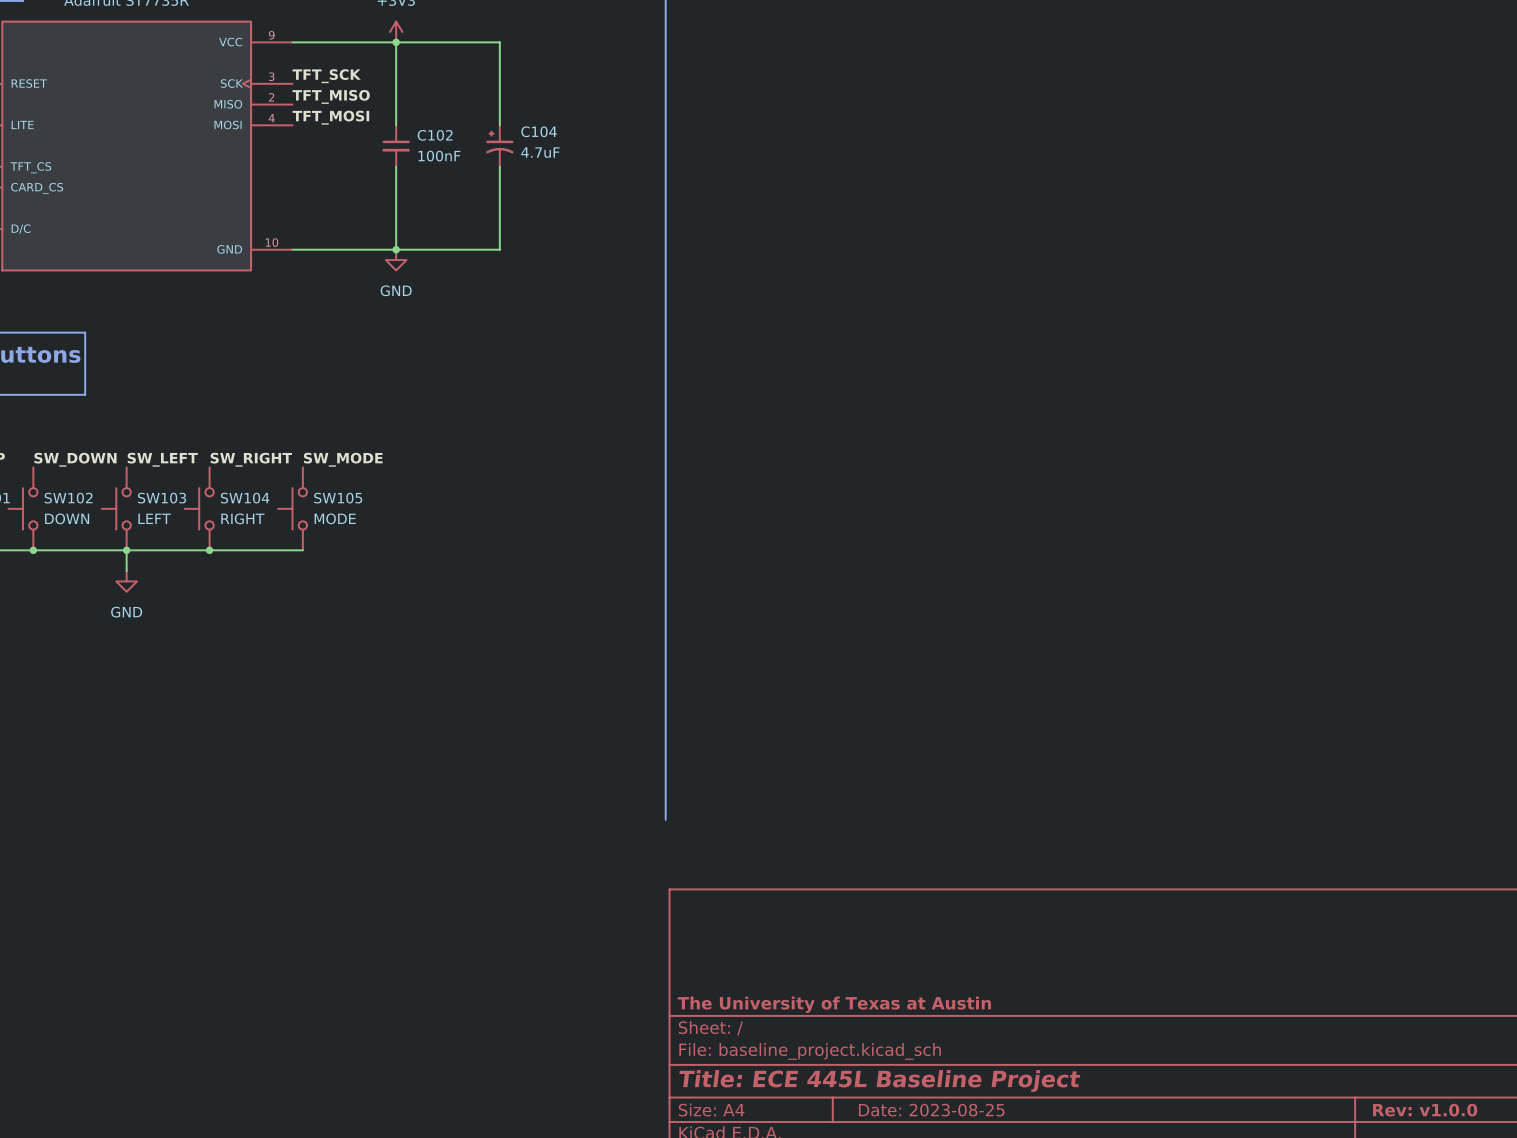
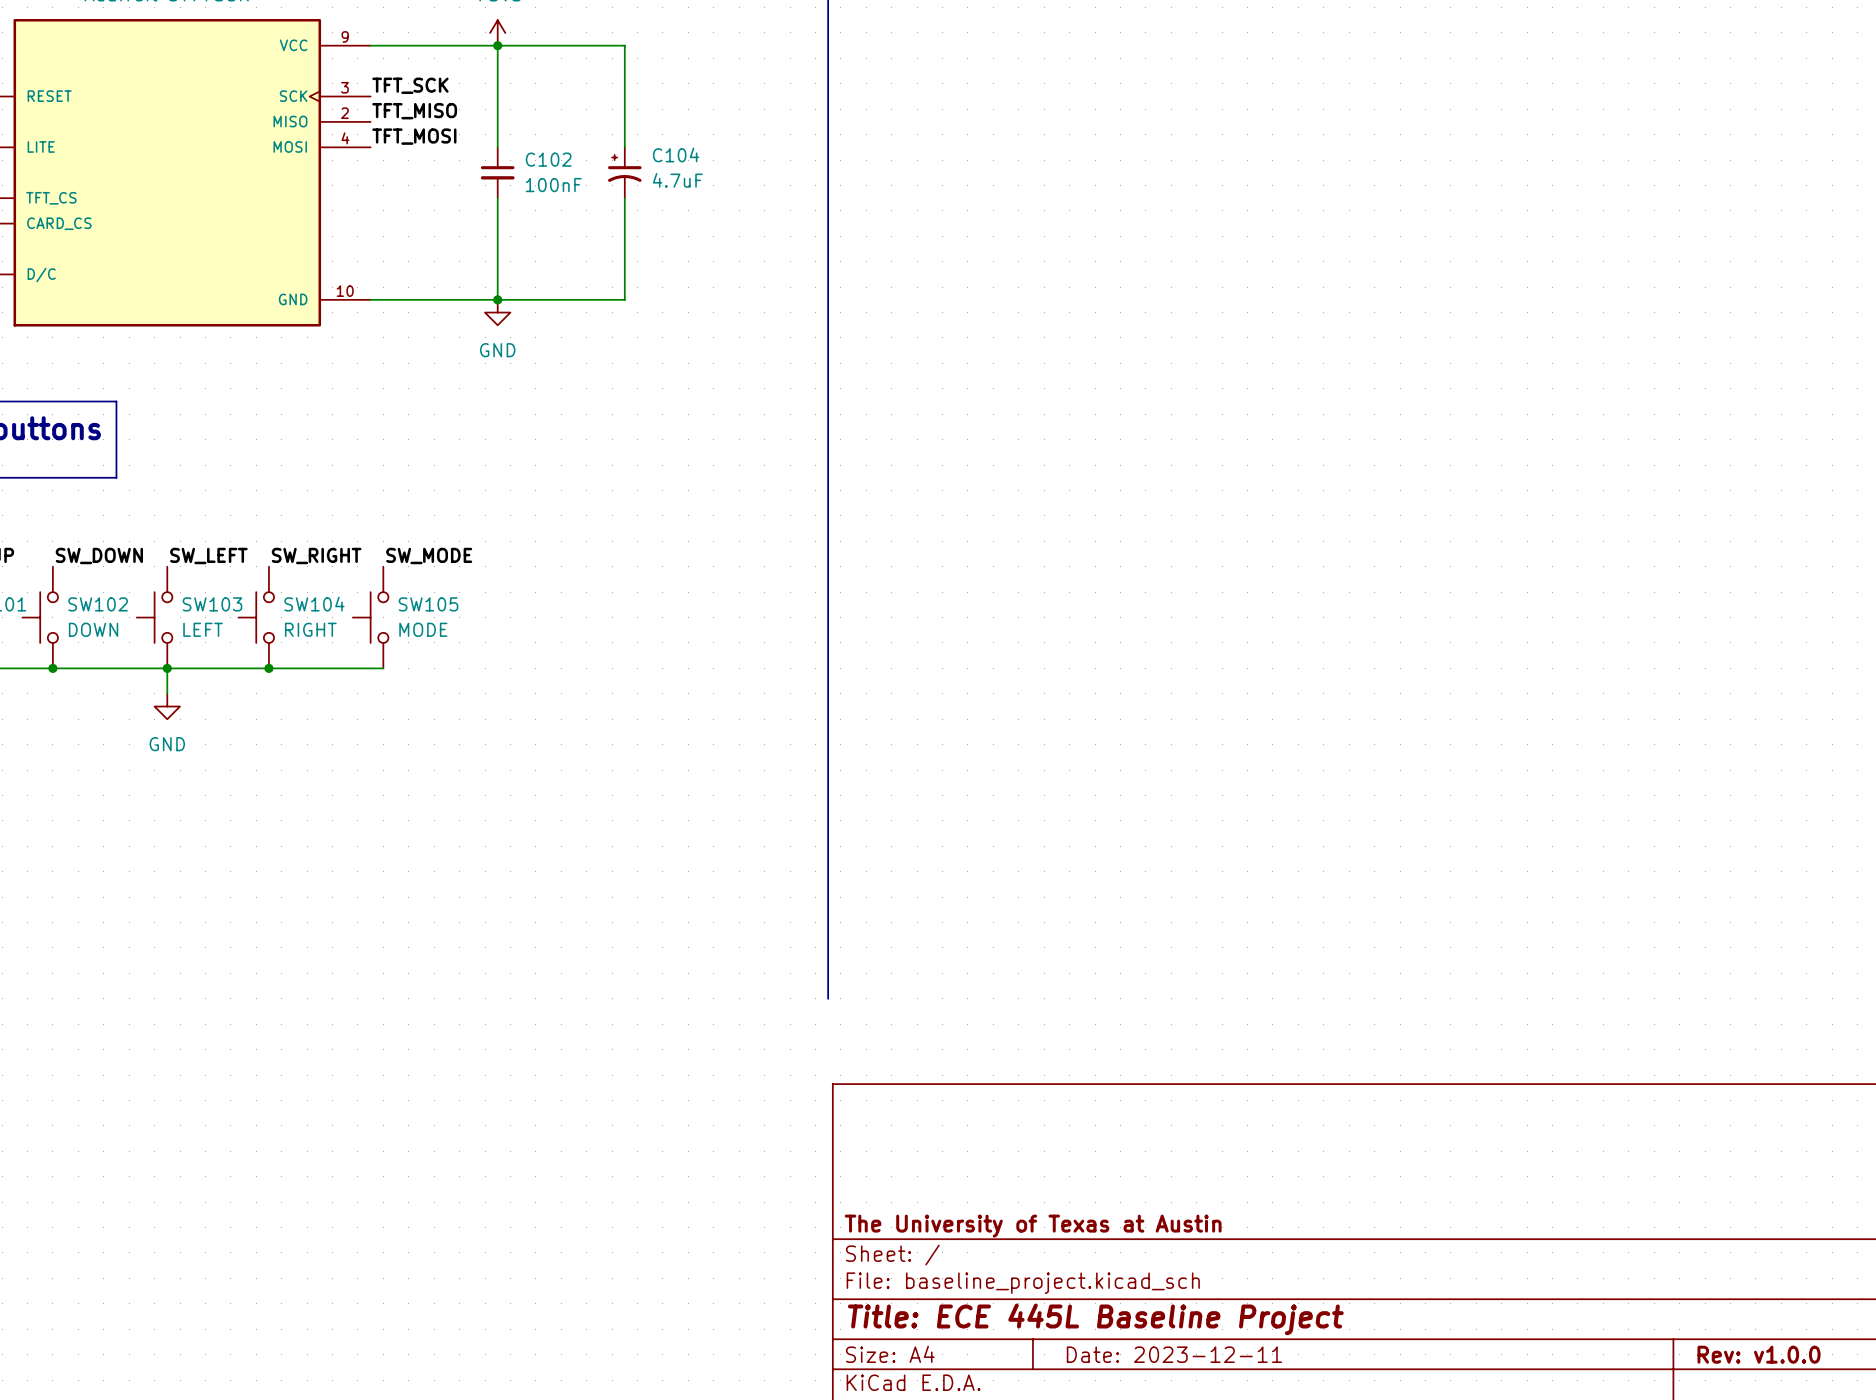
title block: Date: 2023-08-25 (931, 1110) -> Date: 2023-12-11 (1174, 1354)

